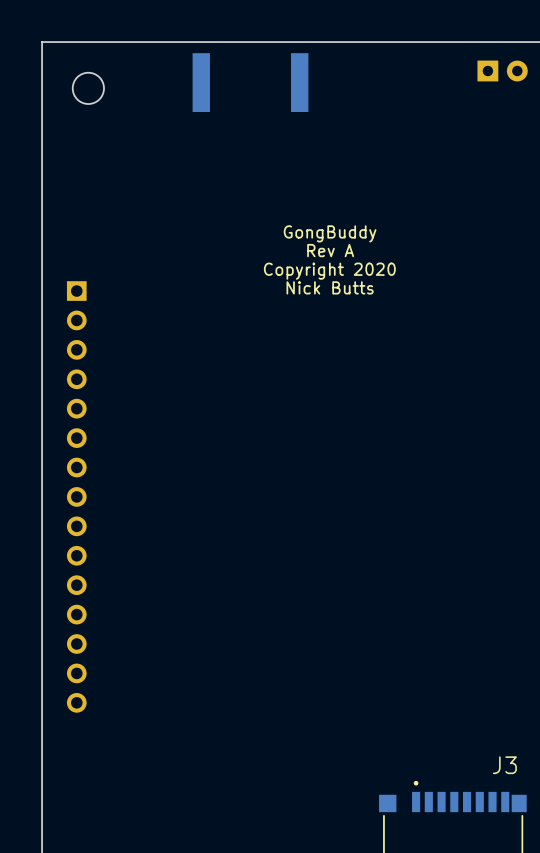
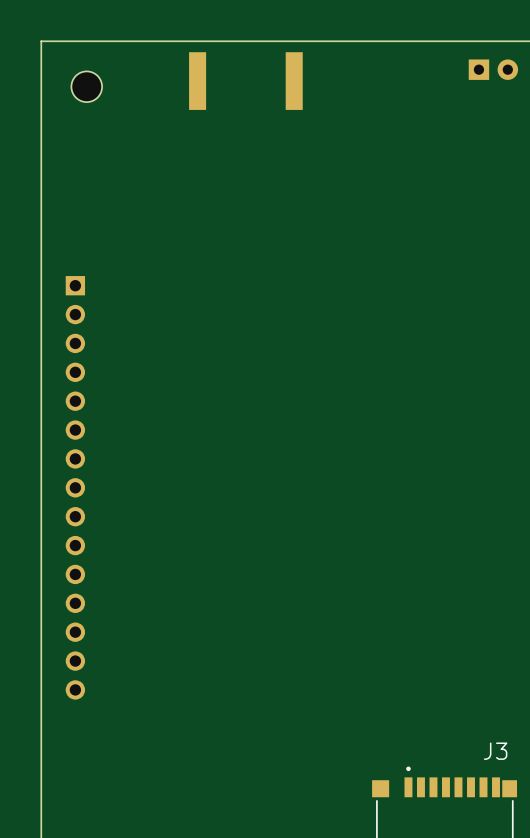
text: GongBuddy (330, 233) -> none
text: Rev A (330, 250) -> none
text: Copyright 2020 (329, 271) -> none
text: Nick Butts (330, 287) -> none

